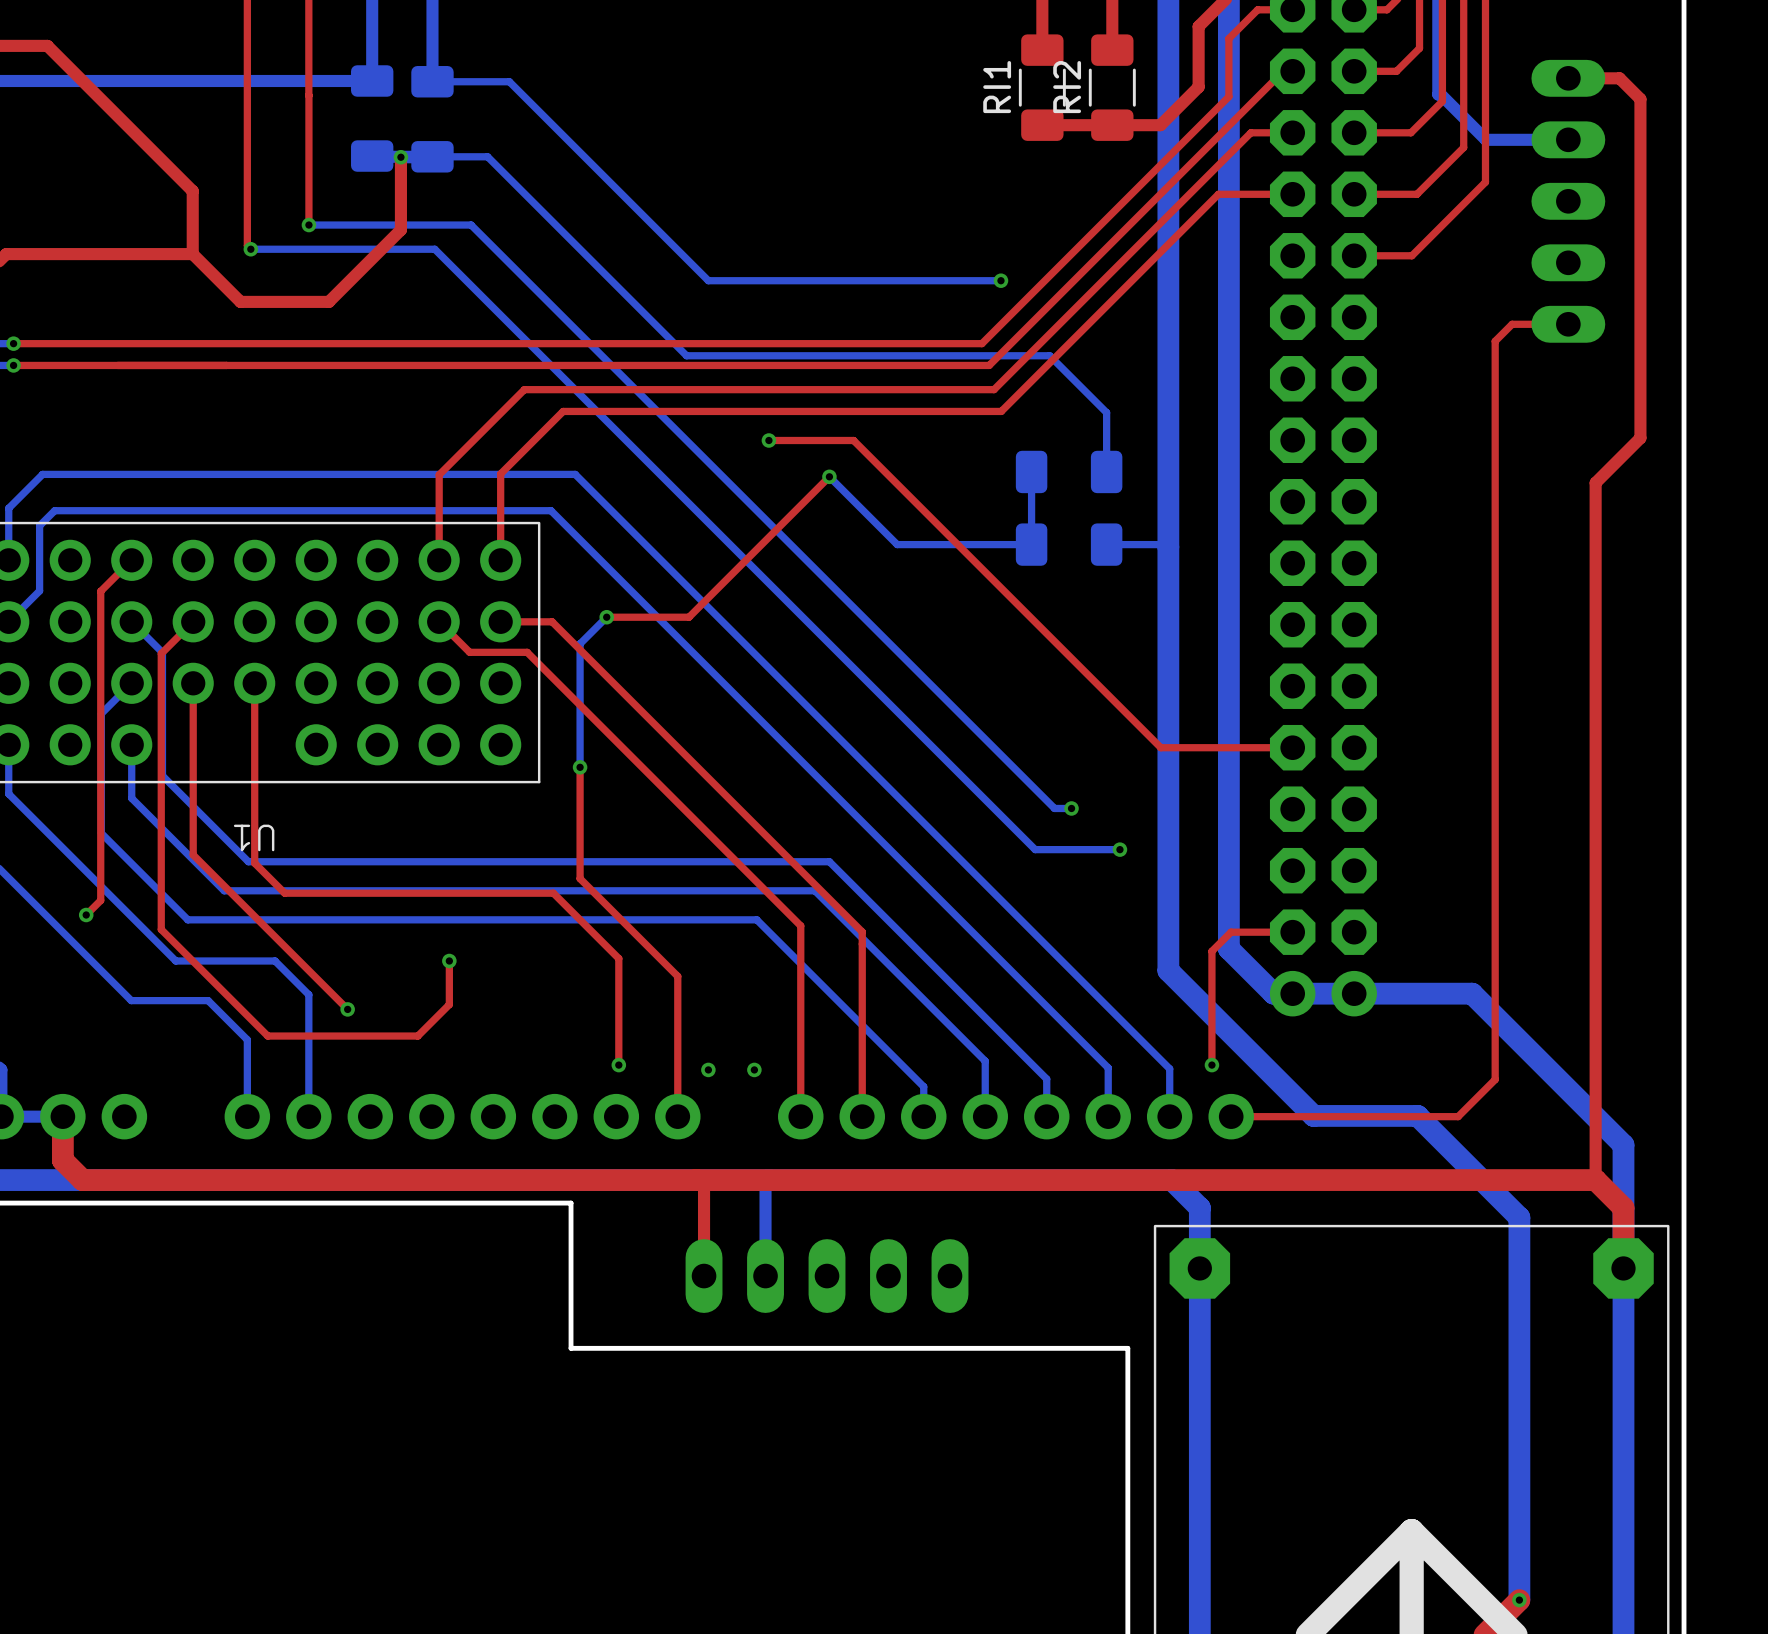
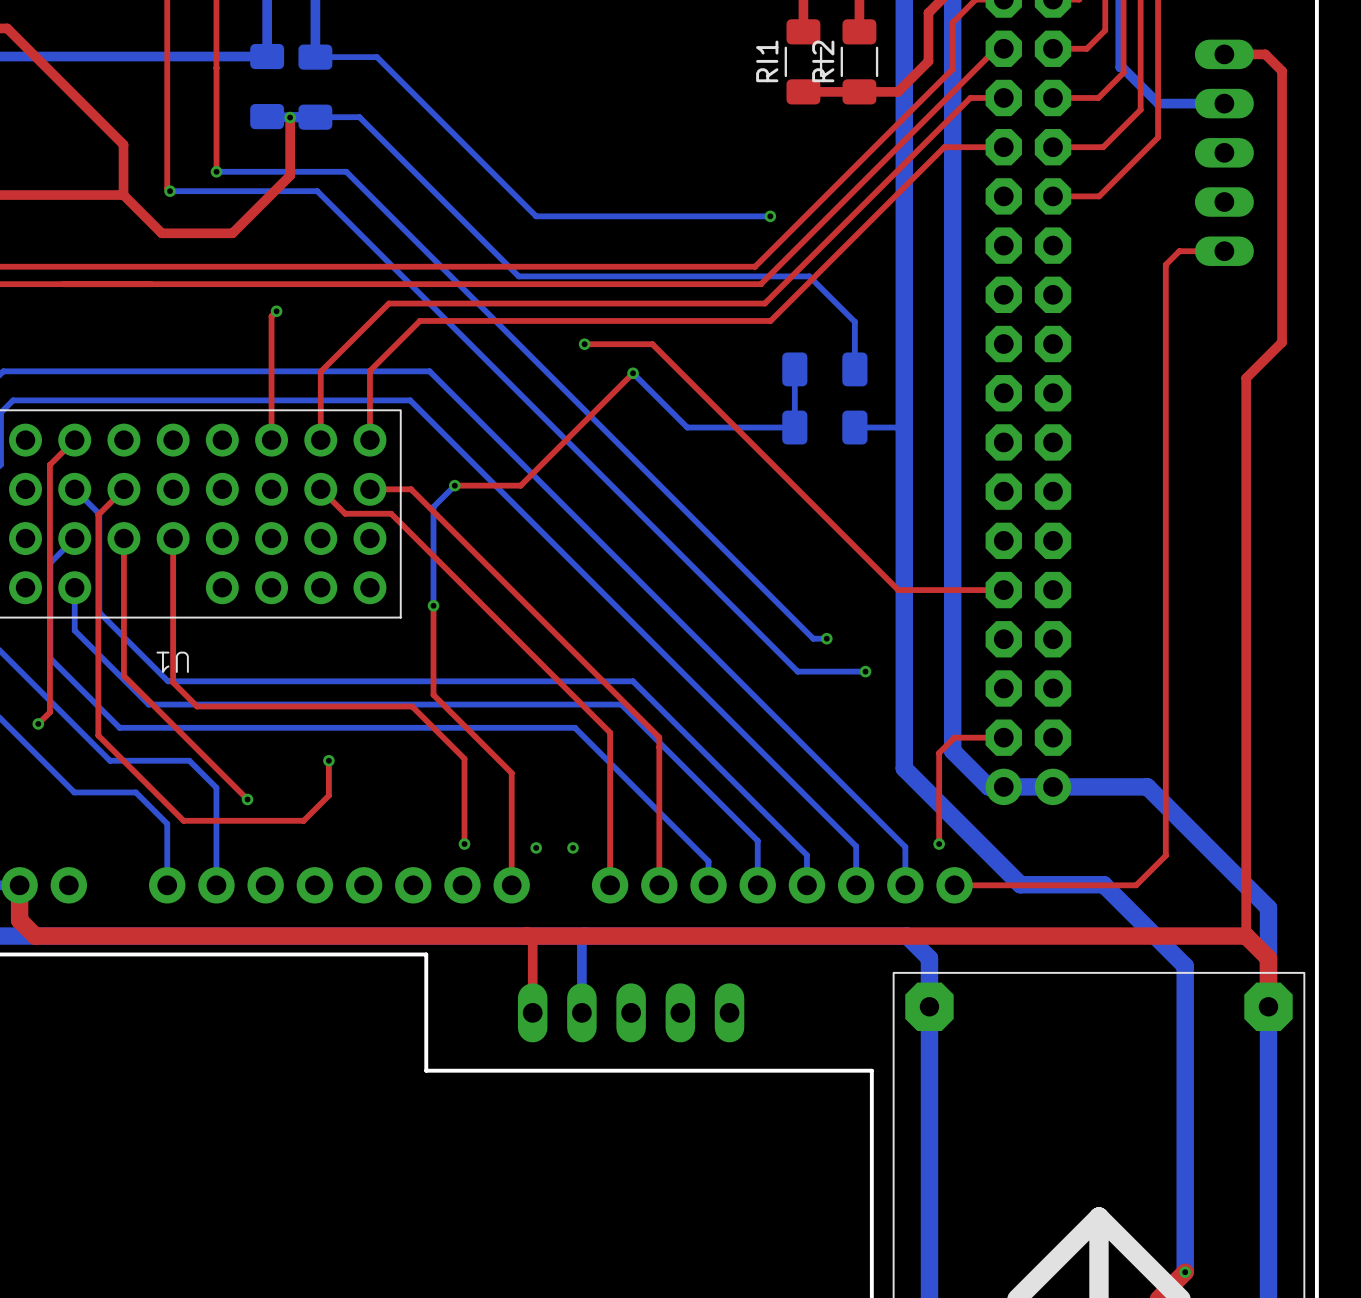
top track: none -> (276, 311) (271, 316) (271, 440)
via: none -> (276, 311)

